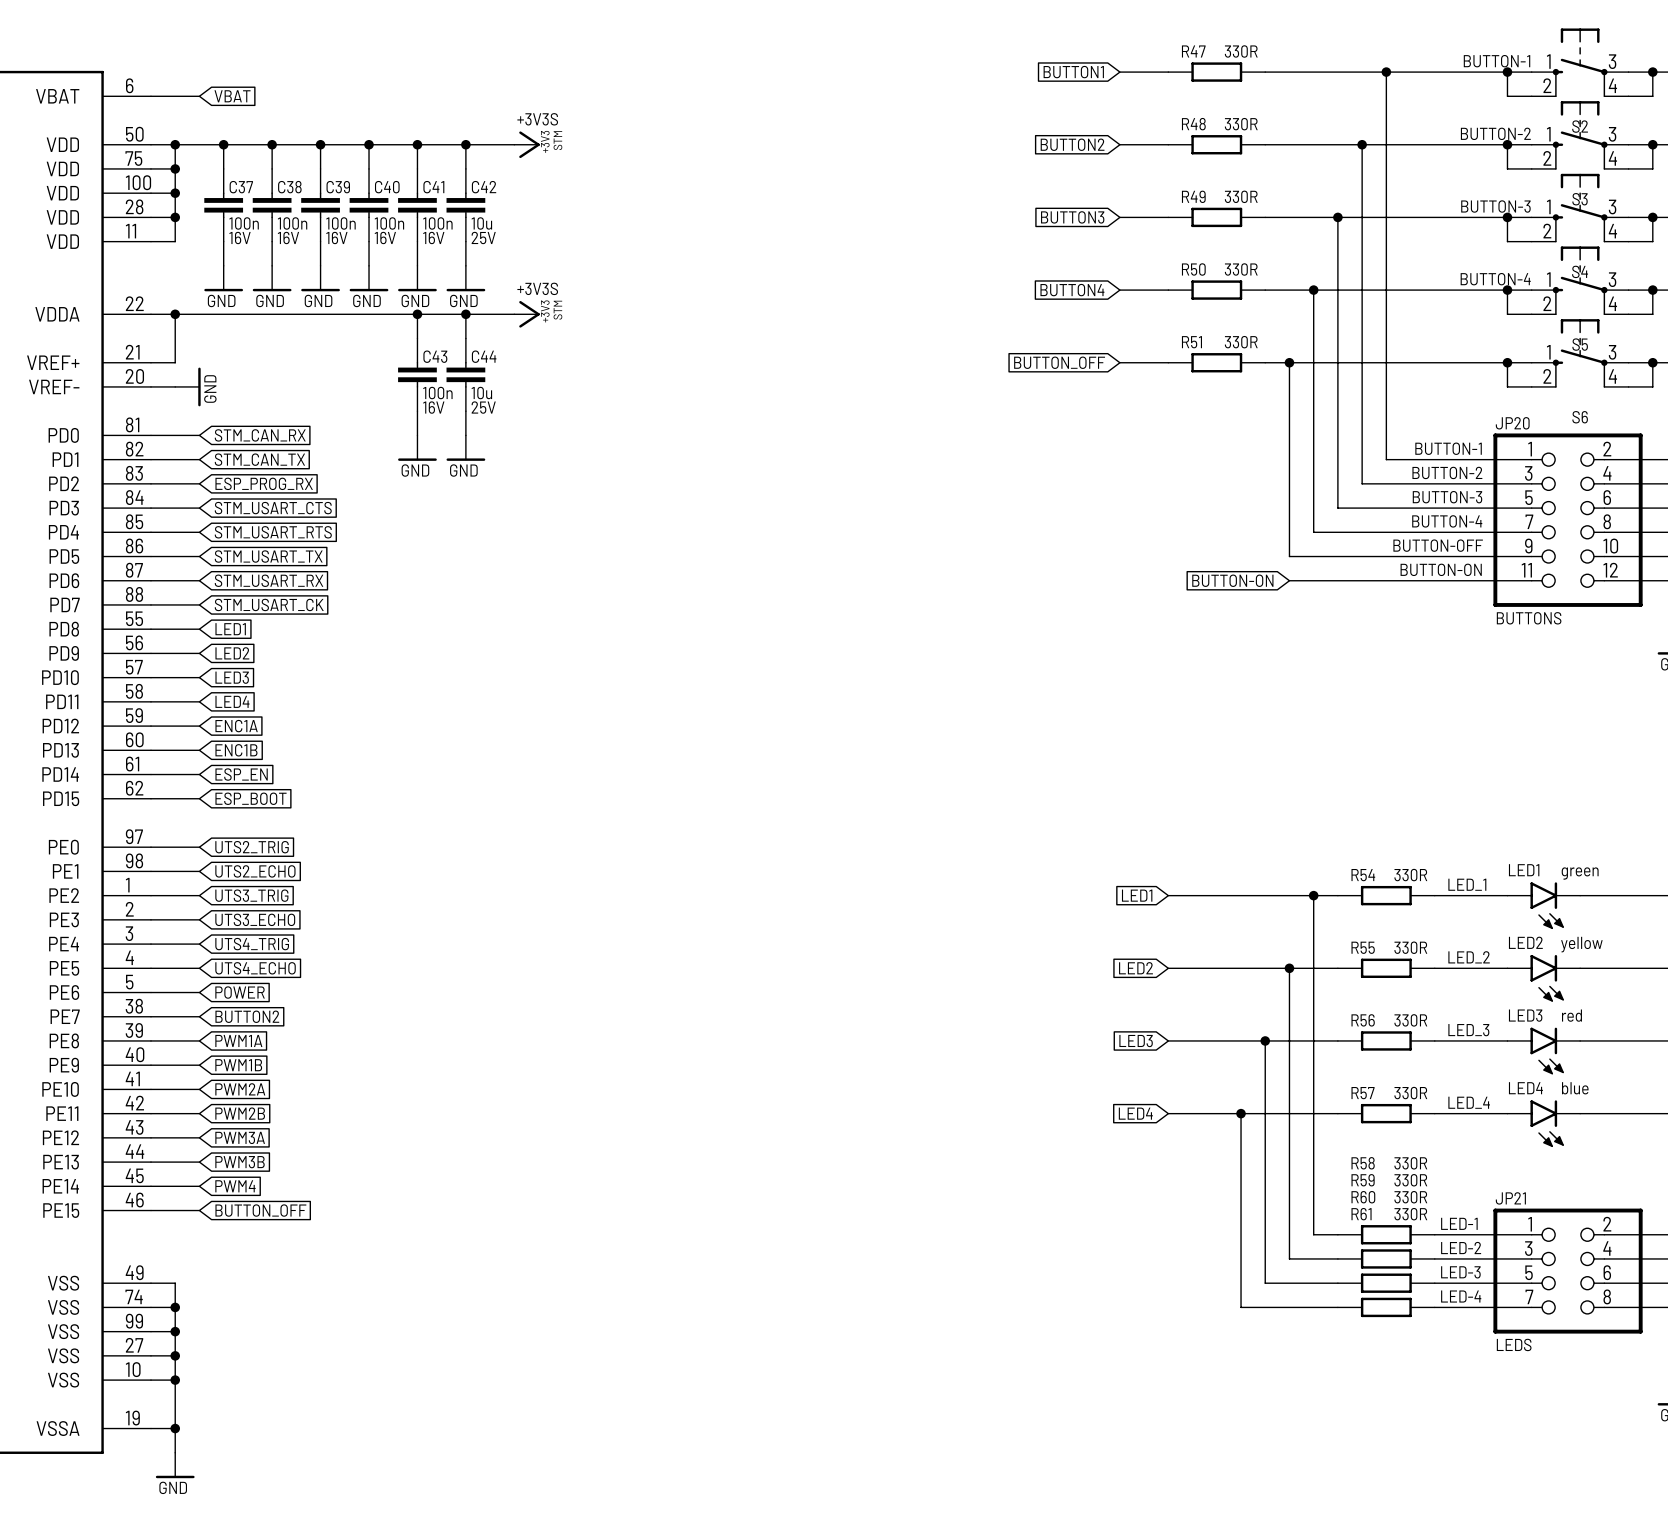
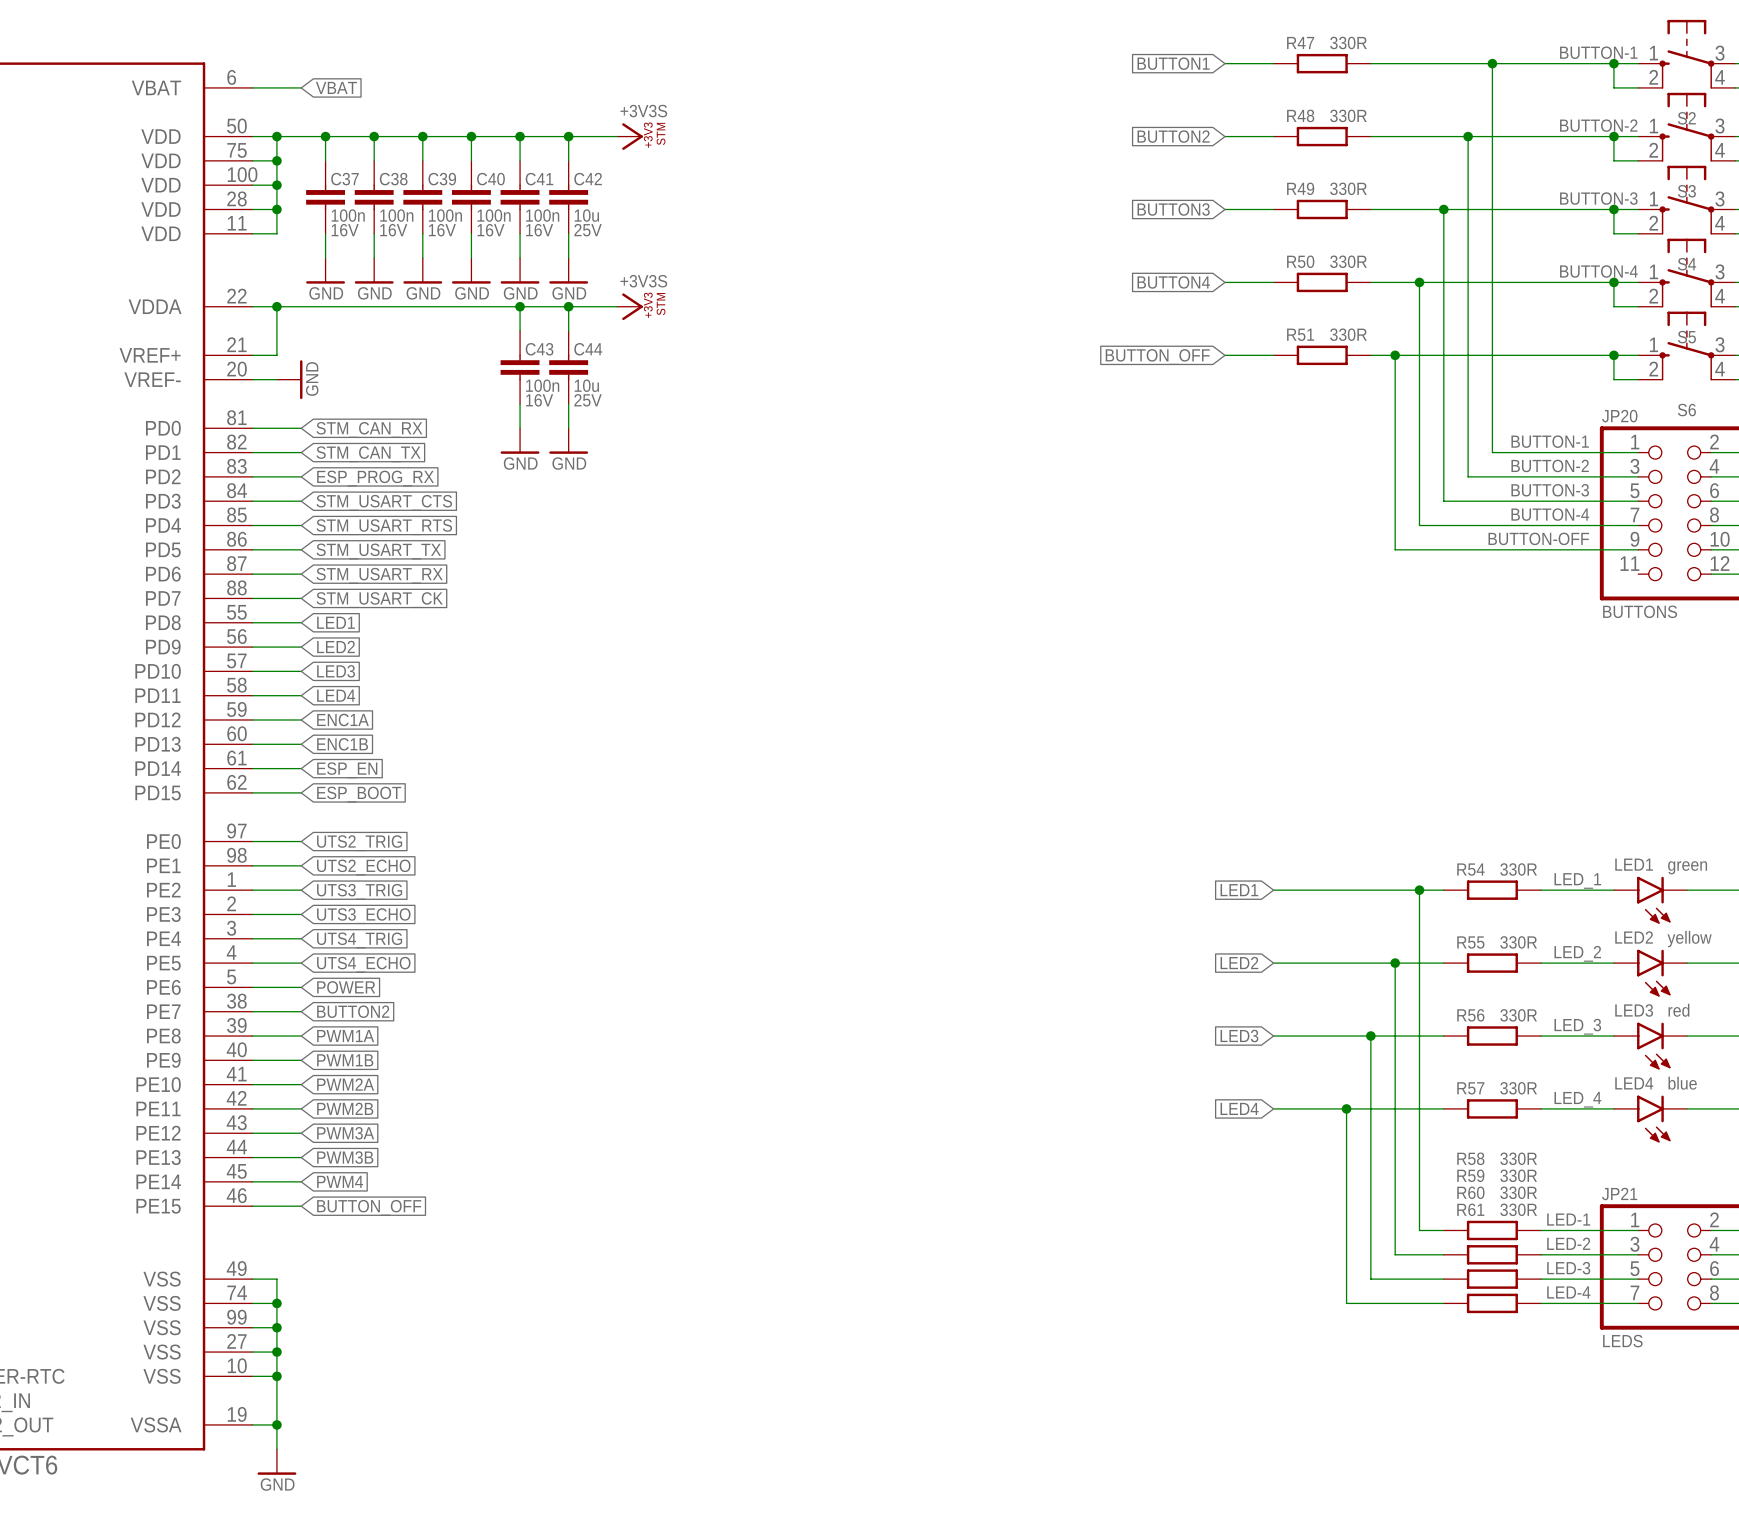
label: BUTTON-ON (1441, 569) -> none
global label: BUTTON-ON (1232, 580) -> none
wire: (1289, 580) (1531, 580) -> none

